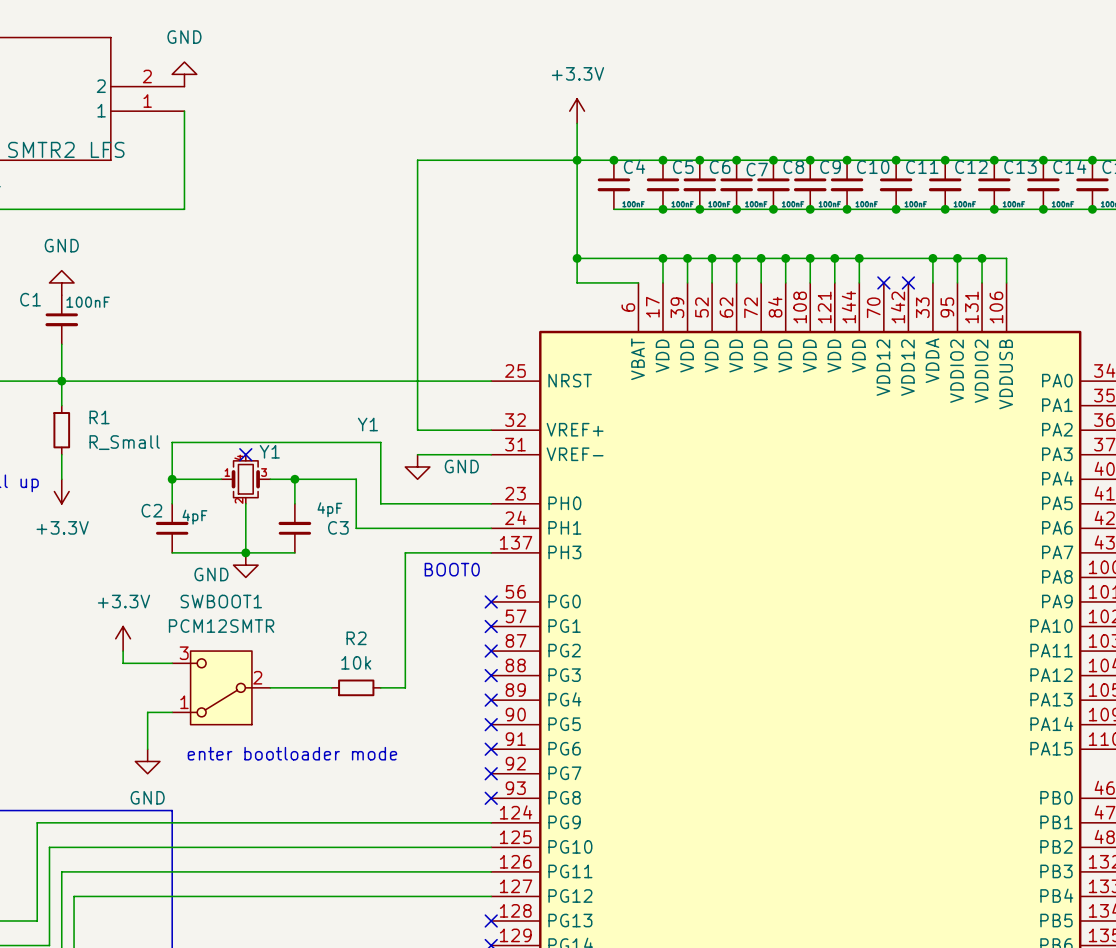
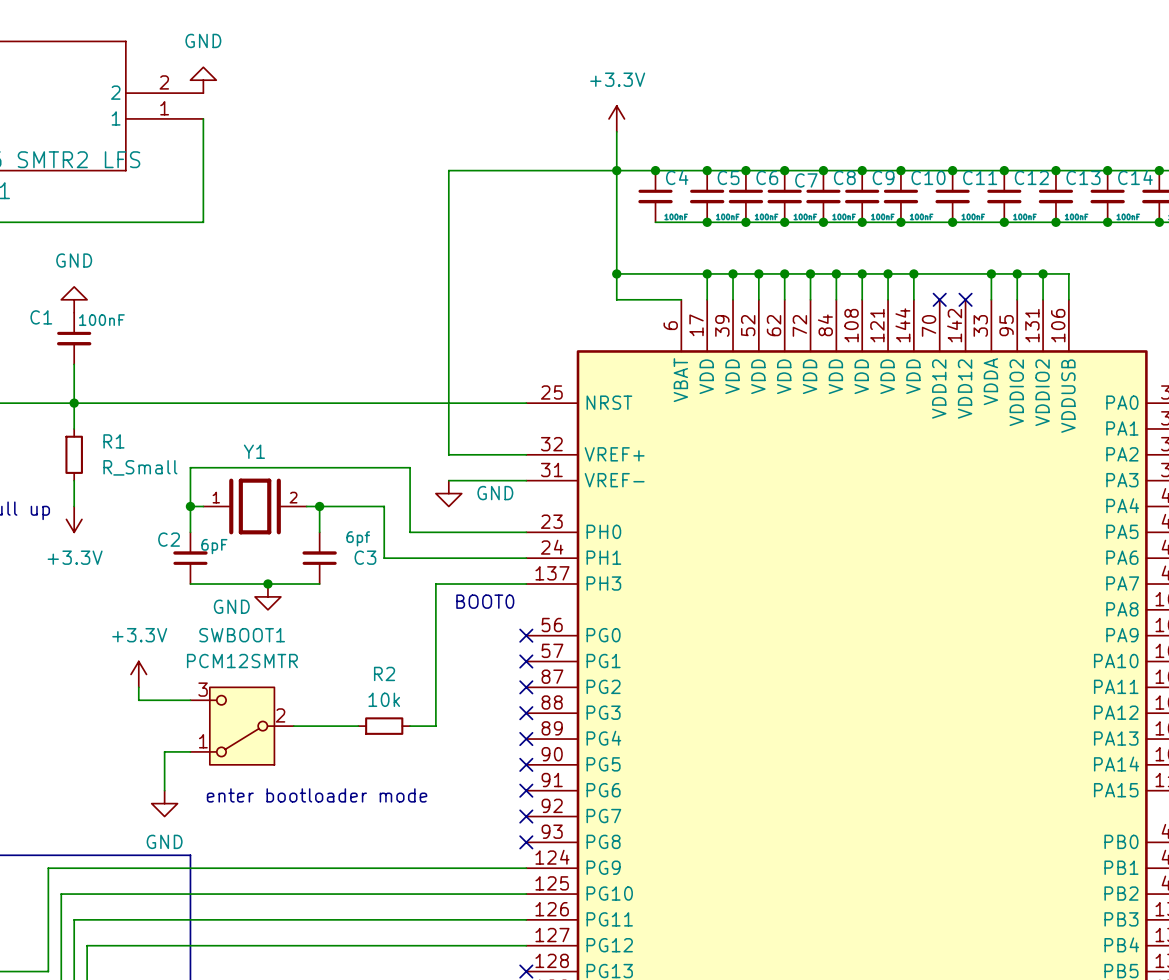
Y1 name position: Y1 (367, 424) -> Y1 (254, 451)
Y1 value: Y1 (269, 451) -> none
Y1 symbol: [221, 454, 271, 504] -> [203, 478, 307, 535]
no-connect mark: (245, 454) -> none
wire: (245, 503) (245, 552) -> none
C3 value: 4pF (329, 509) -> 6pf (358, 538)
C2 value: 4pF (194, 517) -> 6pF (214, 546)

